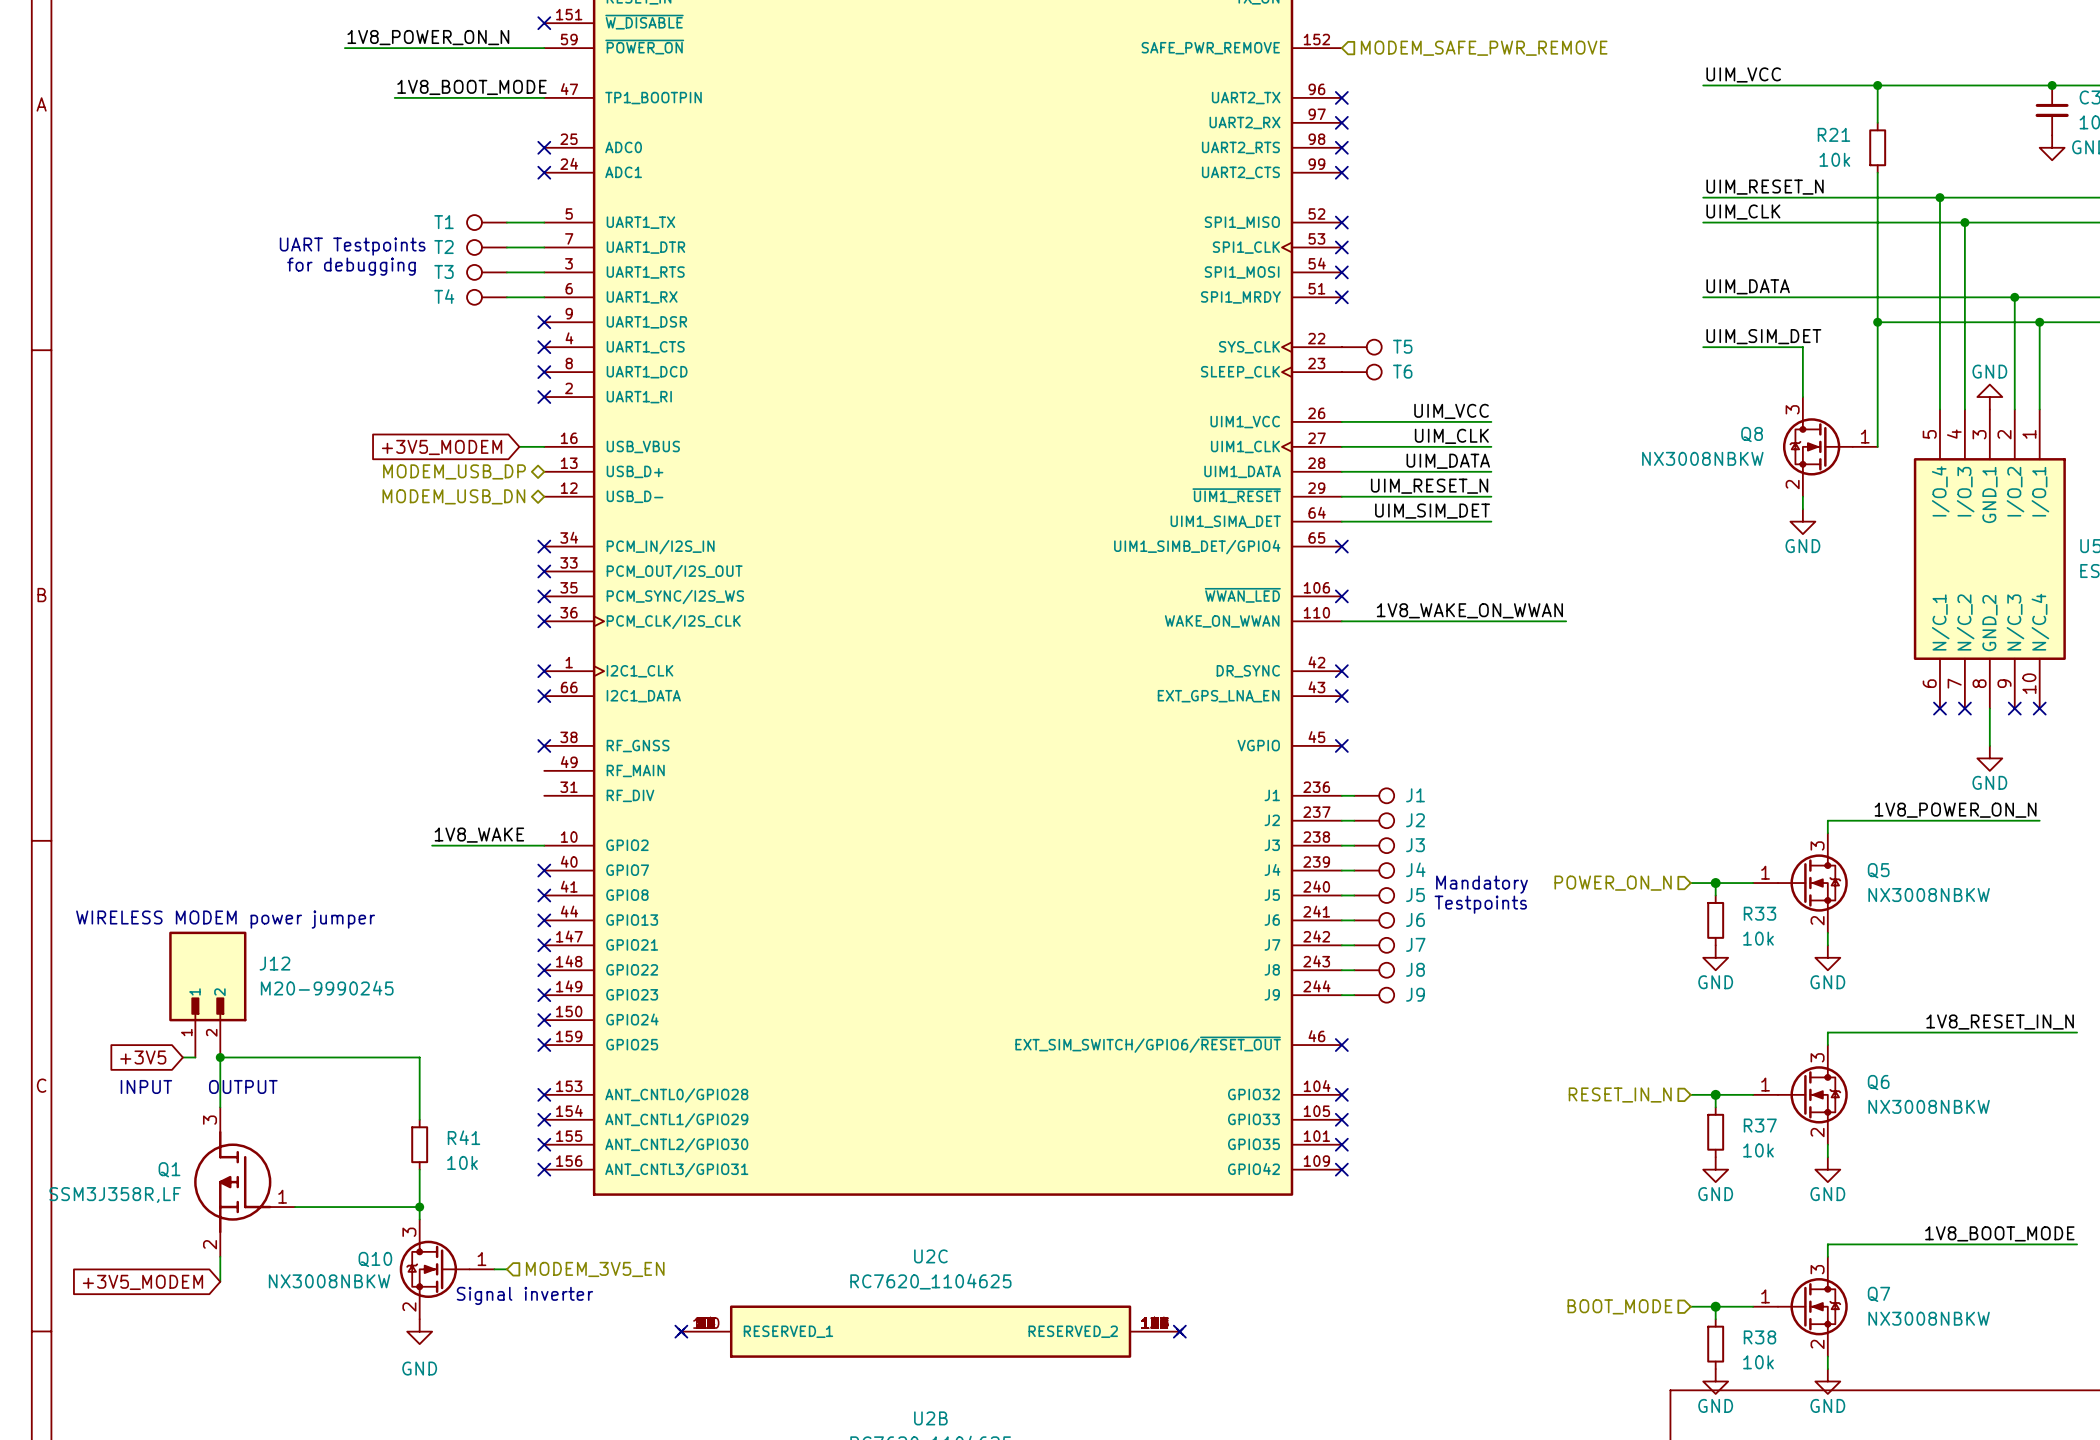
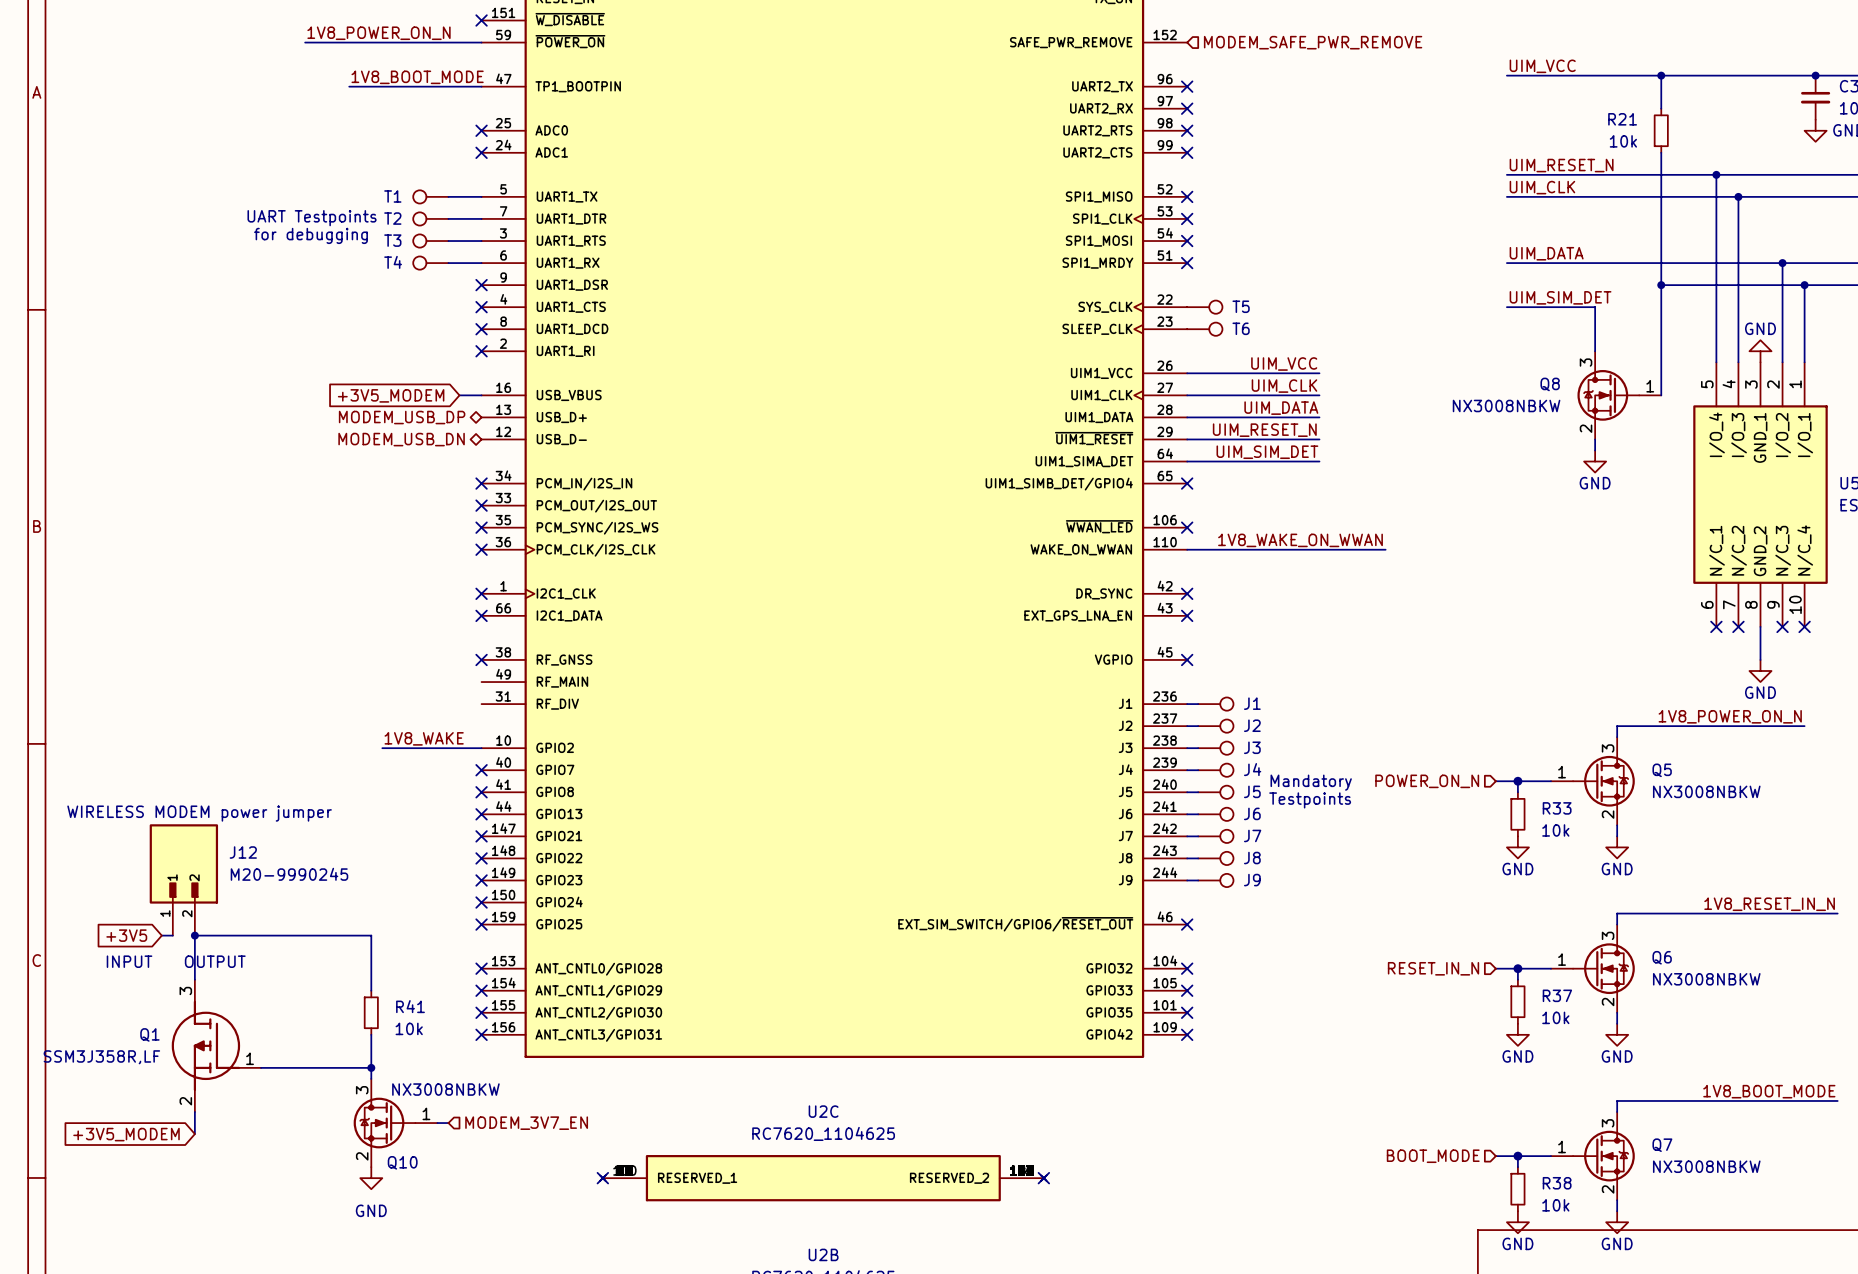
Q10 name position: Q10 (375, 1259) -> Q10 (402, 1162)
hierarchical label: MODEM_3V5_EN (595, 1269) -> MODEM_3V7_EN (526, 1123)
Q10 value position: NX3008NBKW (329, 1281) -> NX3008NBKW (445, 1089)
text: Signal inverter (524, 1295) -> none

